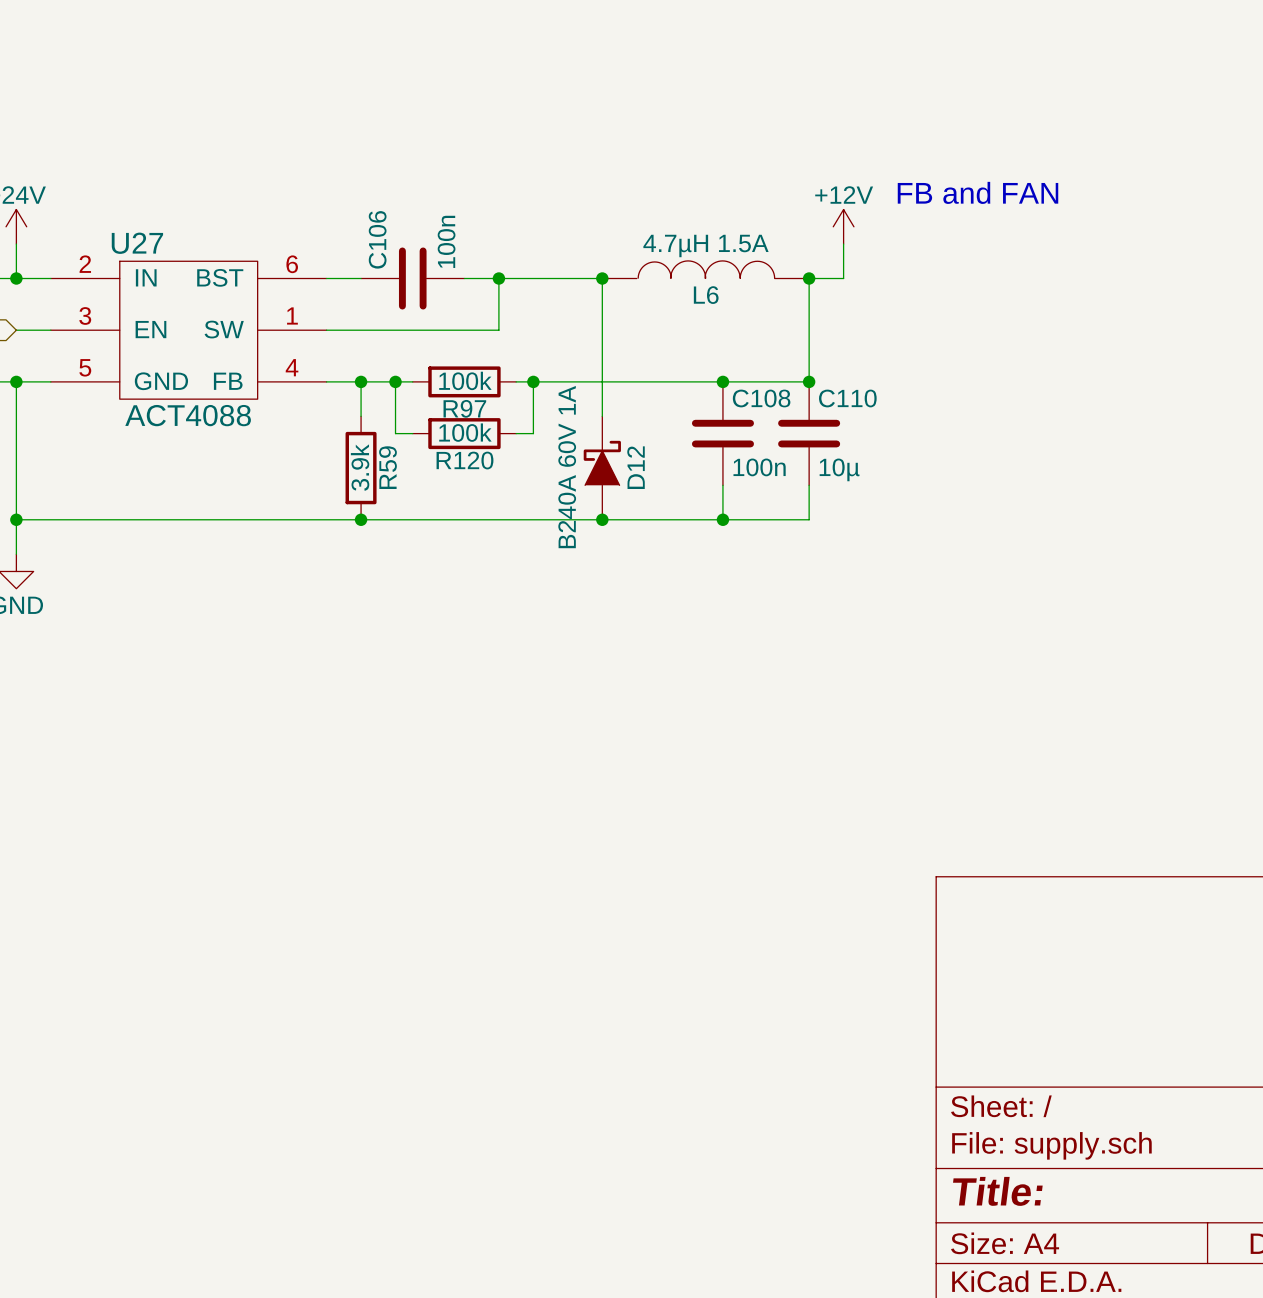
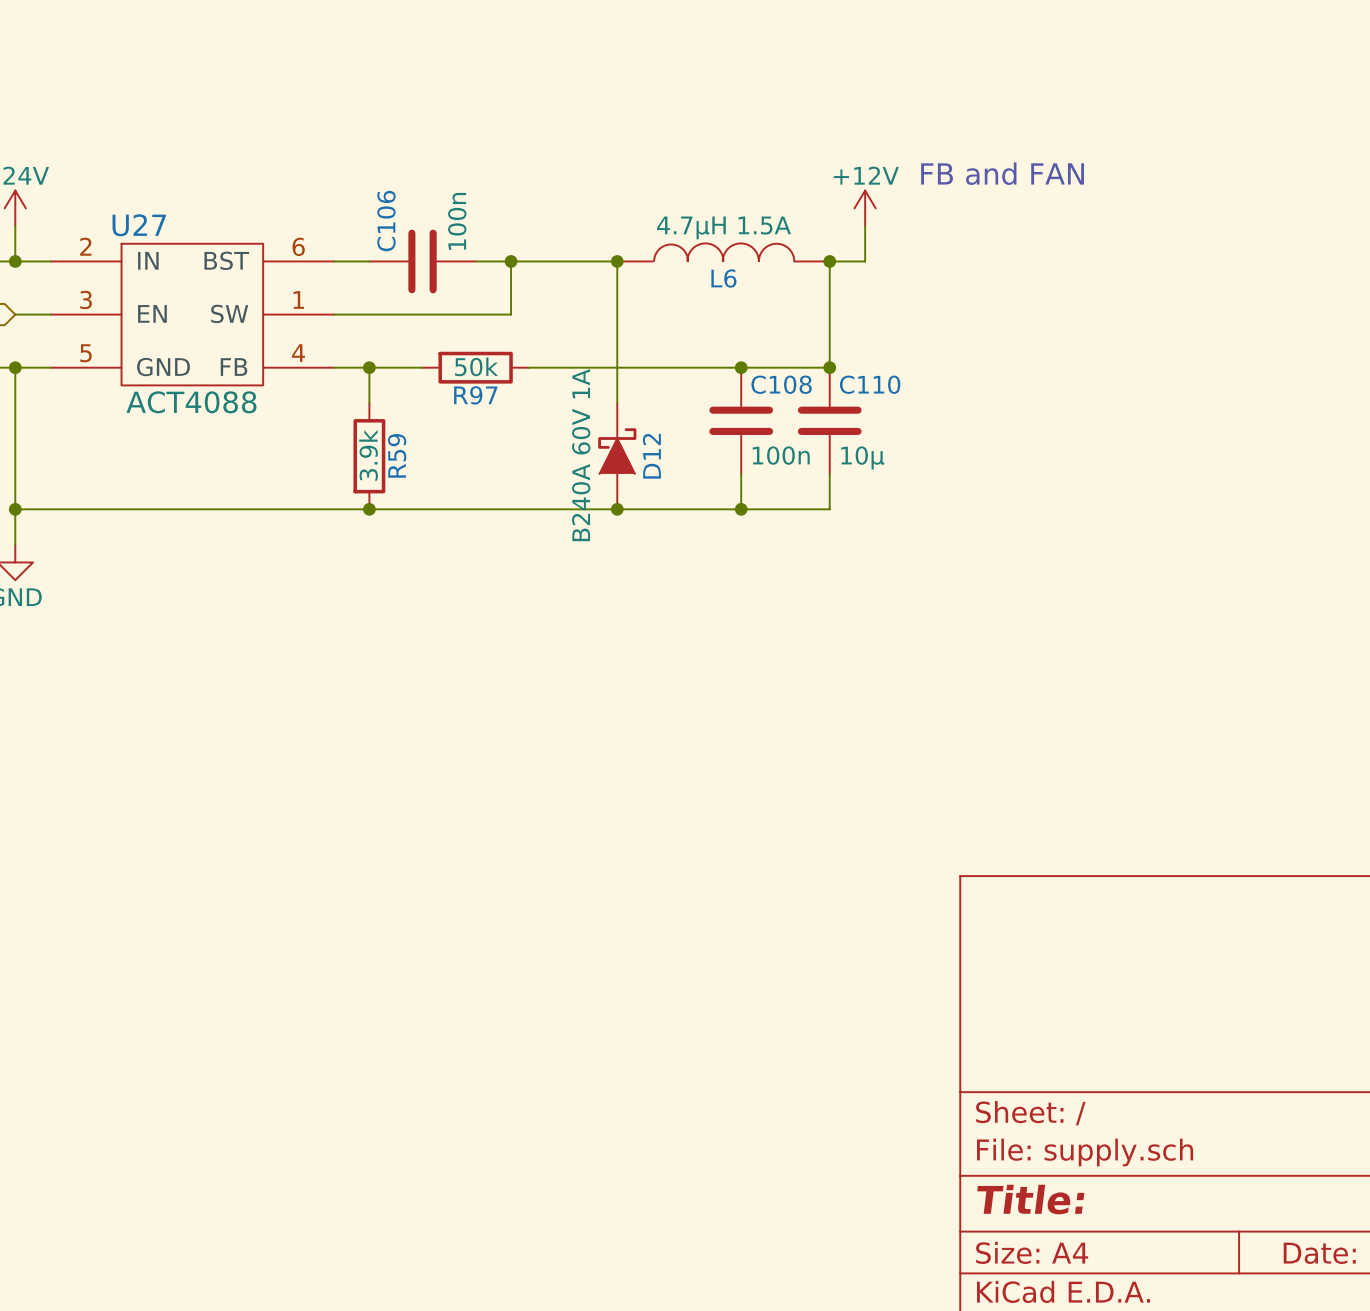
R97 value: 100k (465, 380) -> 50k (476, 366)
wire: (395, 381) (395, 433) (412, 433) -> none
junction: (395, 381) -> none
wire: (533, 381) (533, 433) (516, 433) -> none
junction: (533, 381) -> none
R120: 100k (464, 433) -> none

